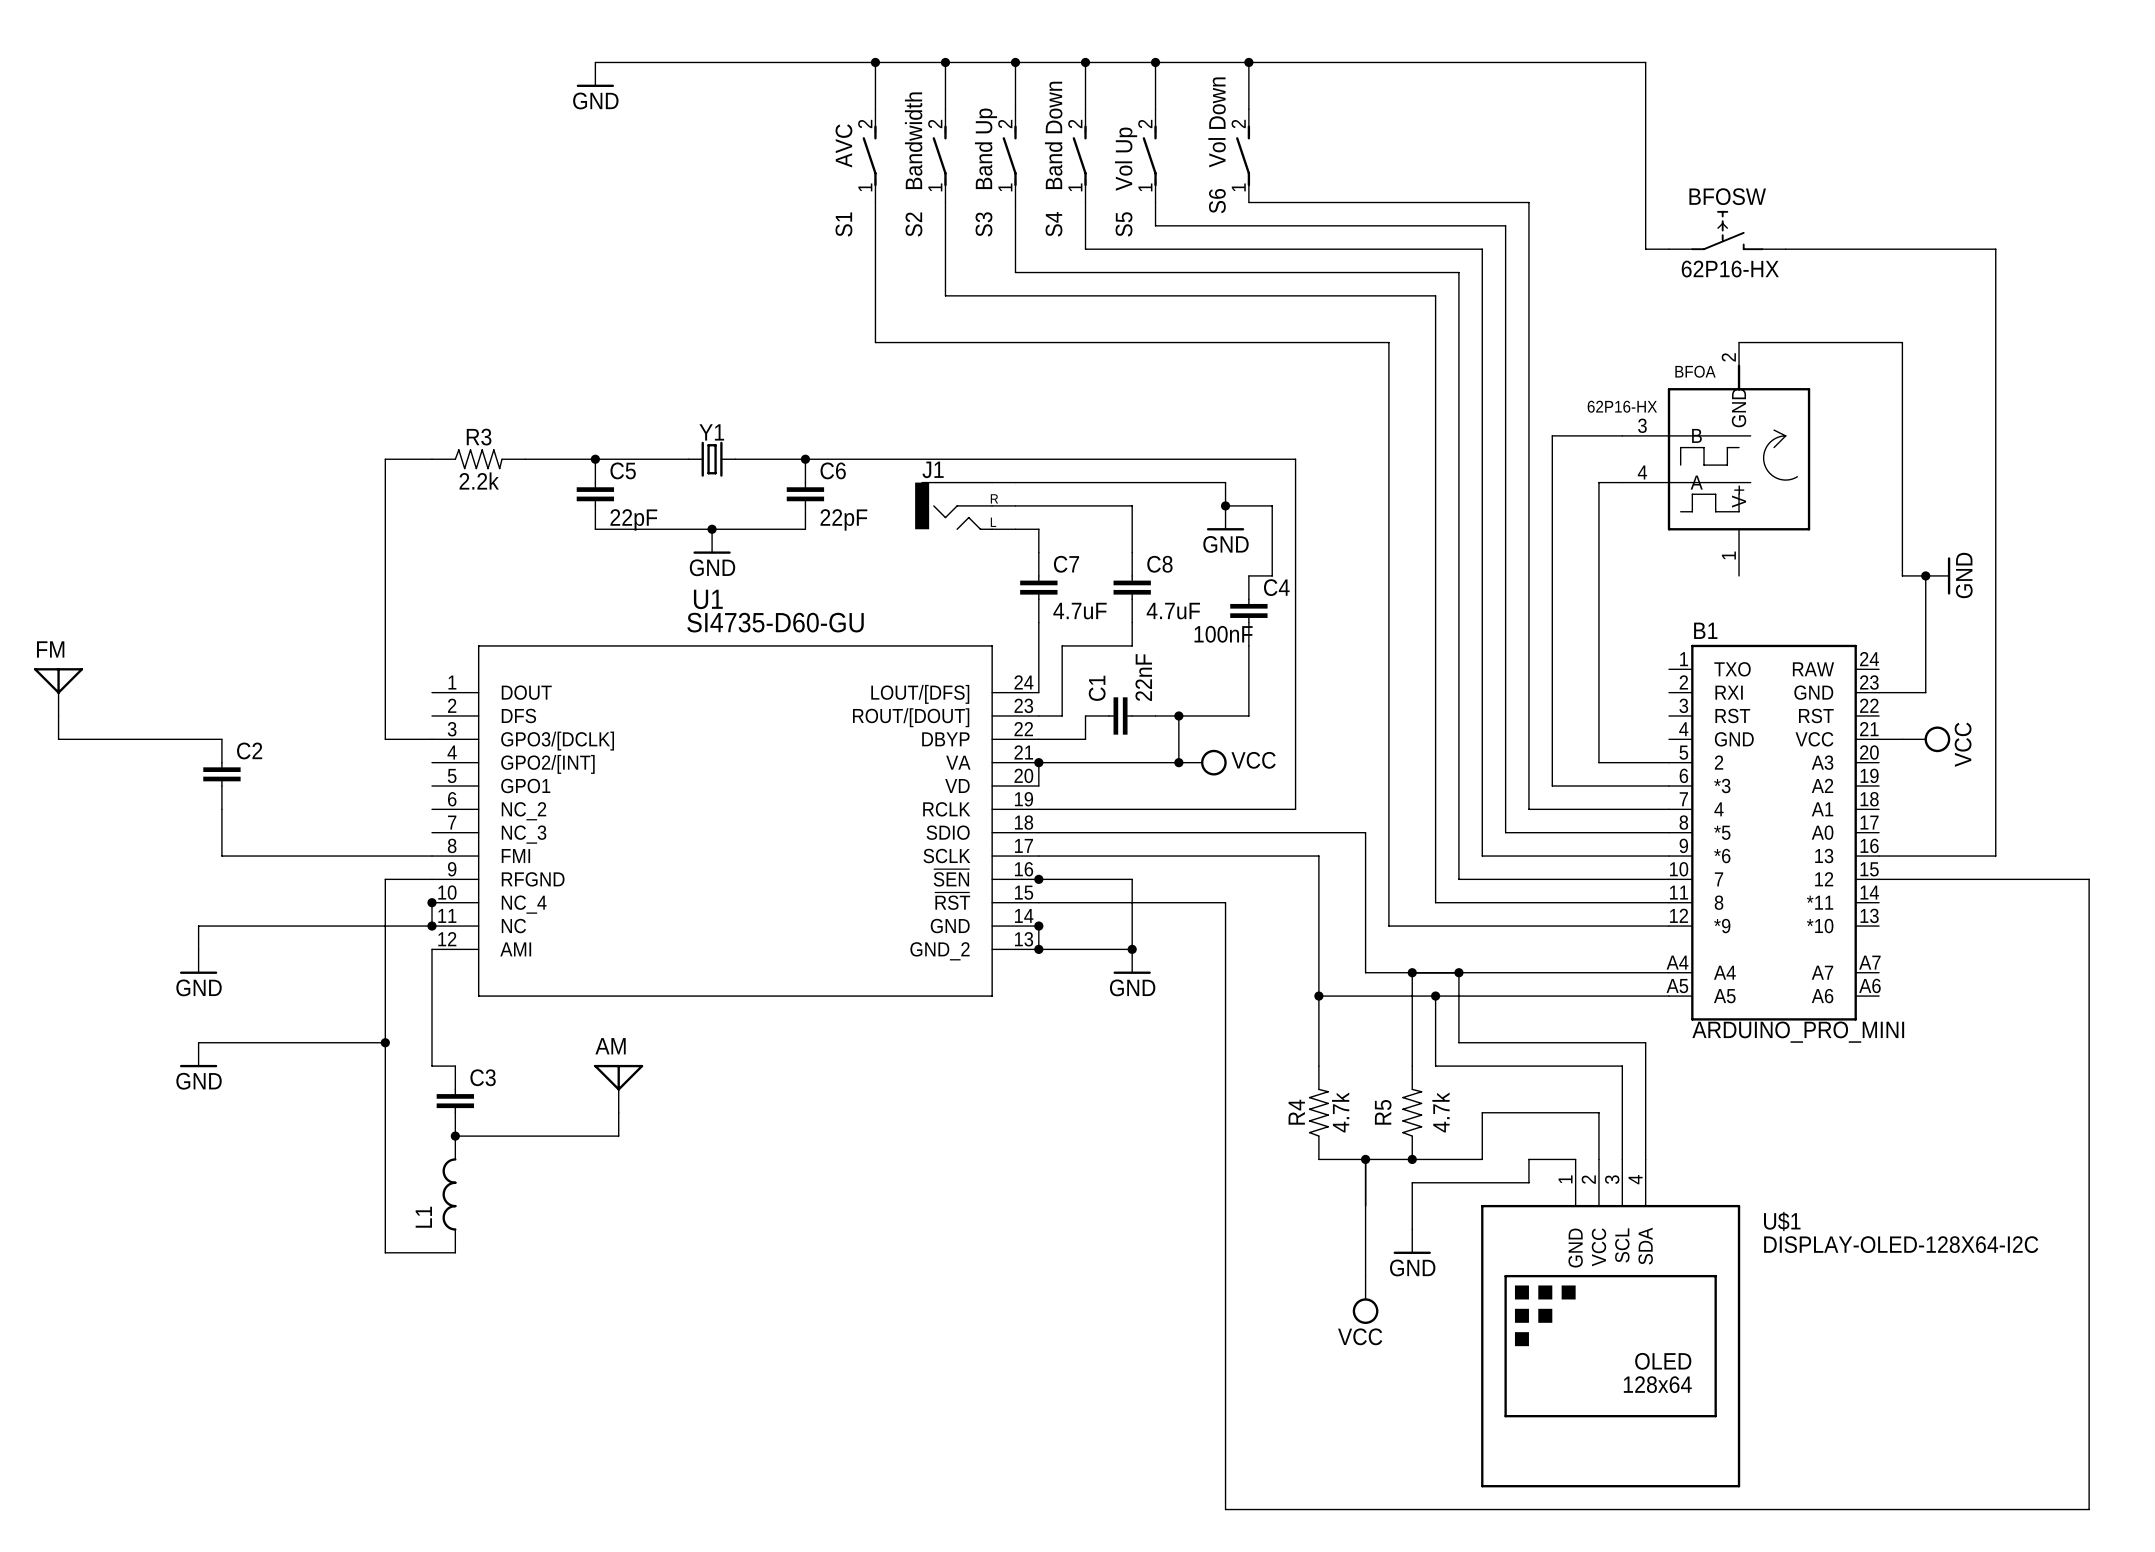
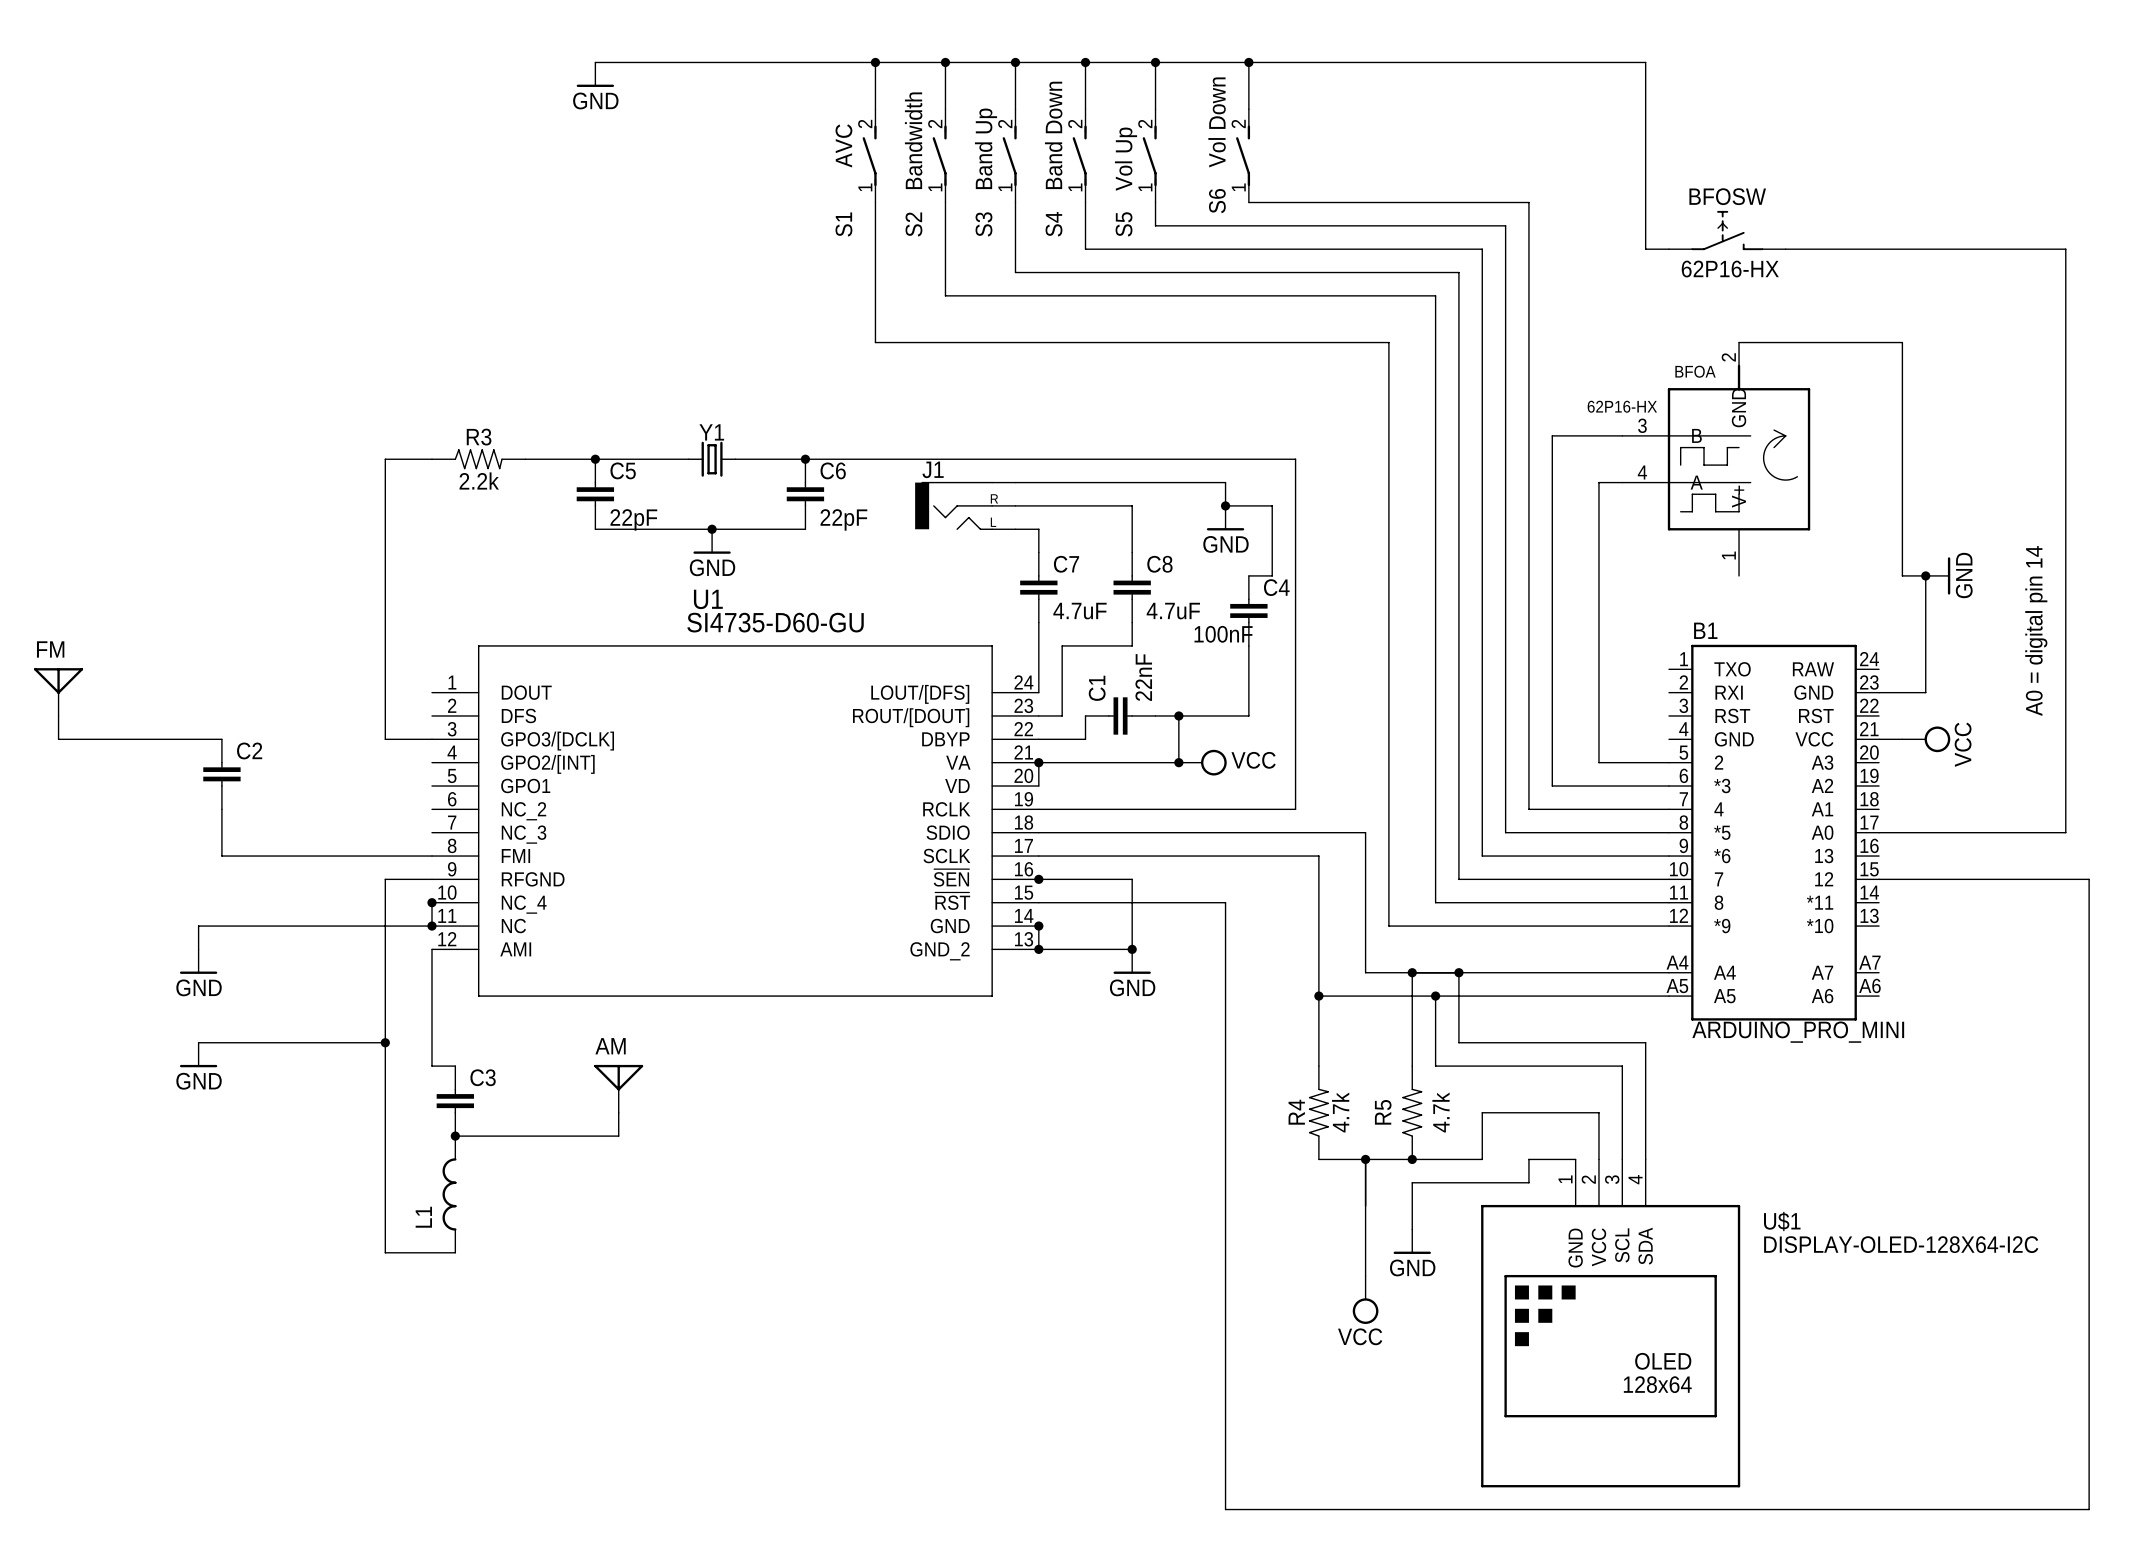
wire: (1995, 249) (1995, 856) (1879, 856) -> (1995, 249) (2065, 249) (2065, 832) (1879, 832)
text: none -> A0 = digital pin 14 (2036, 631)

